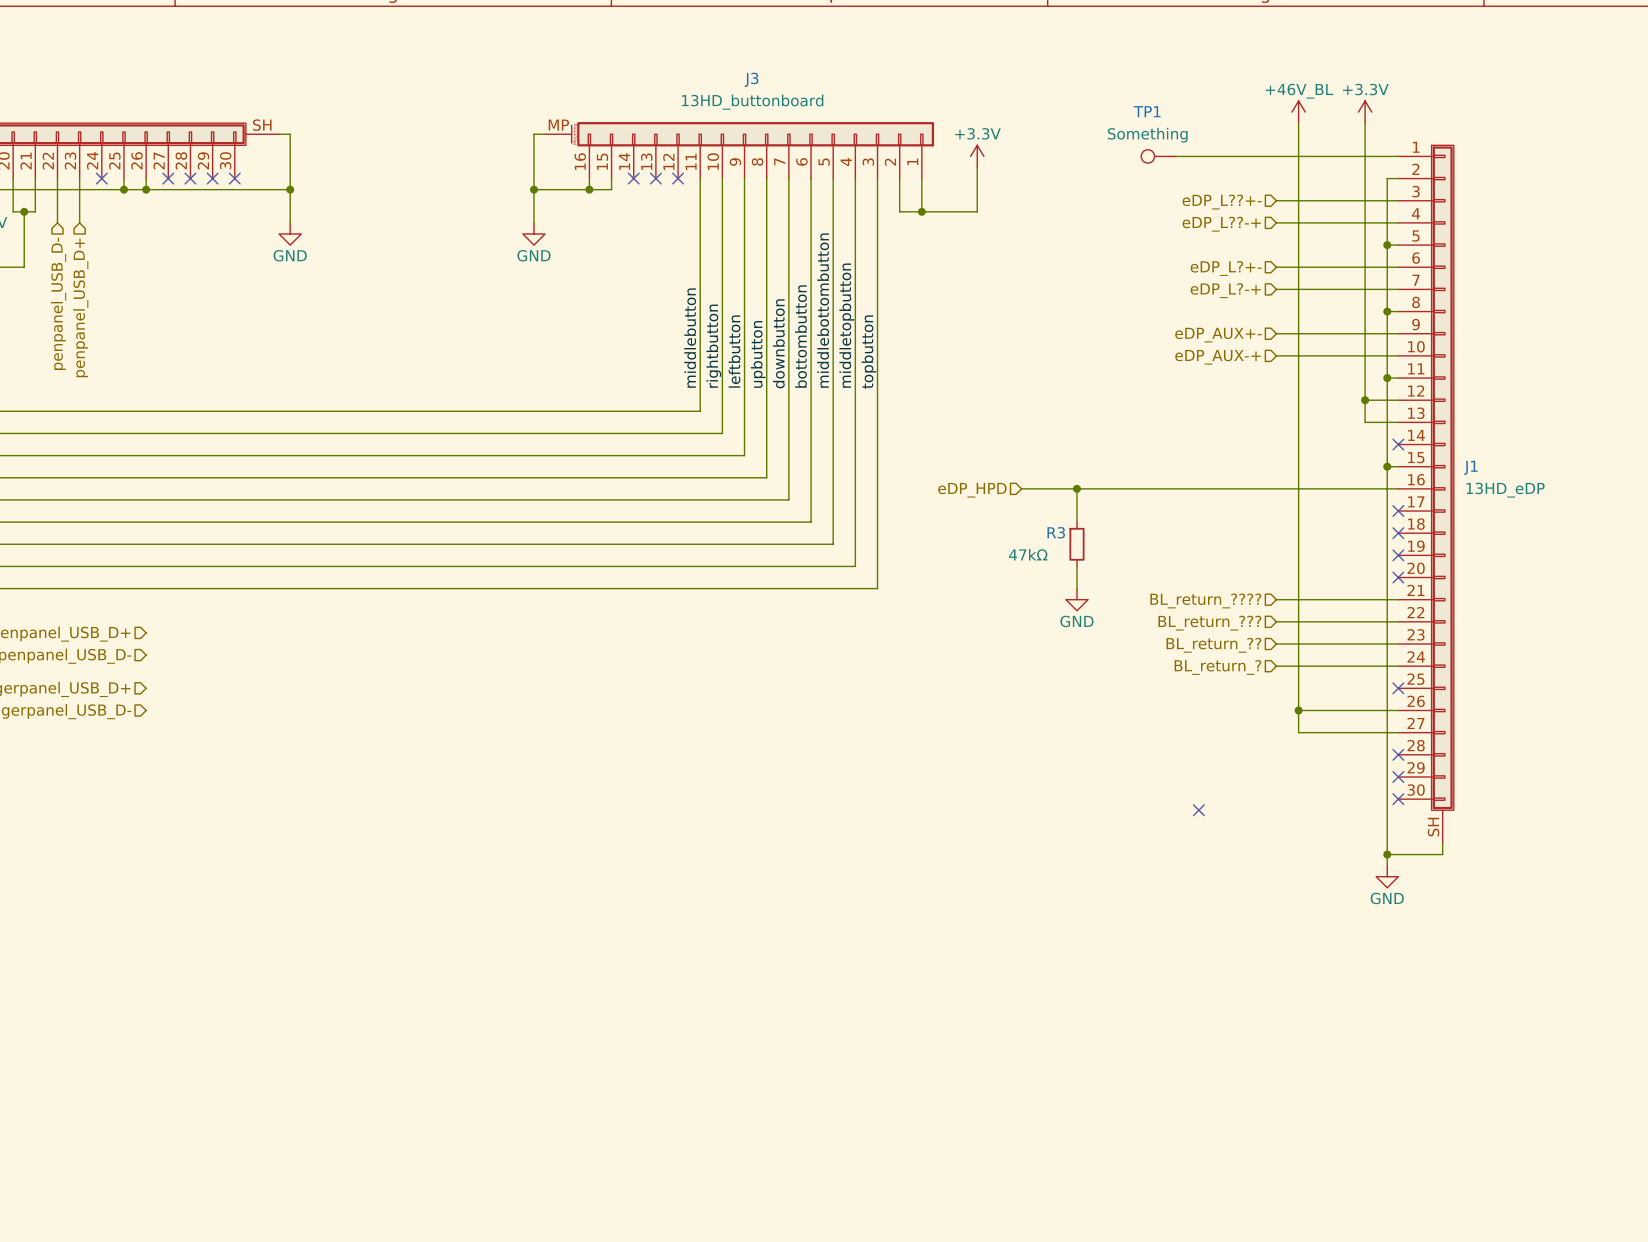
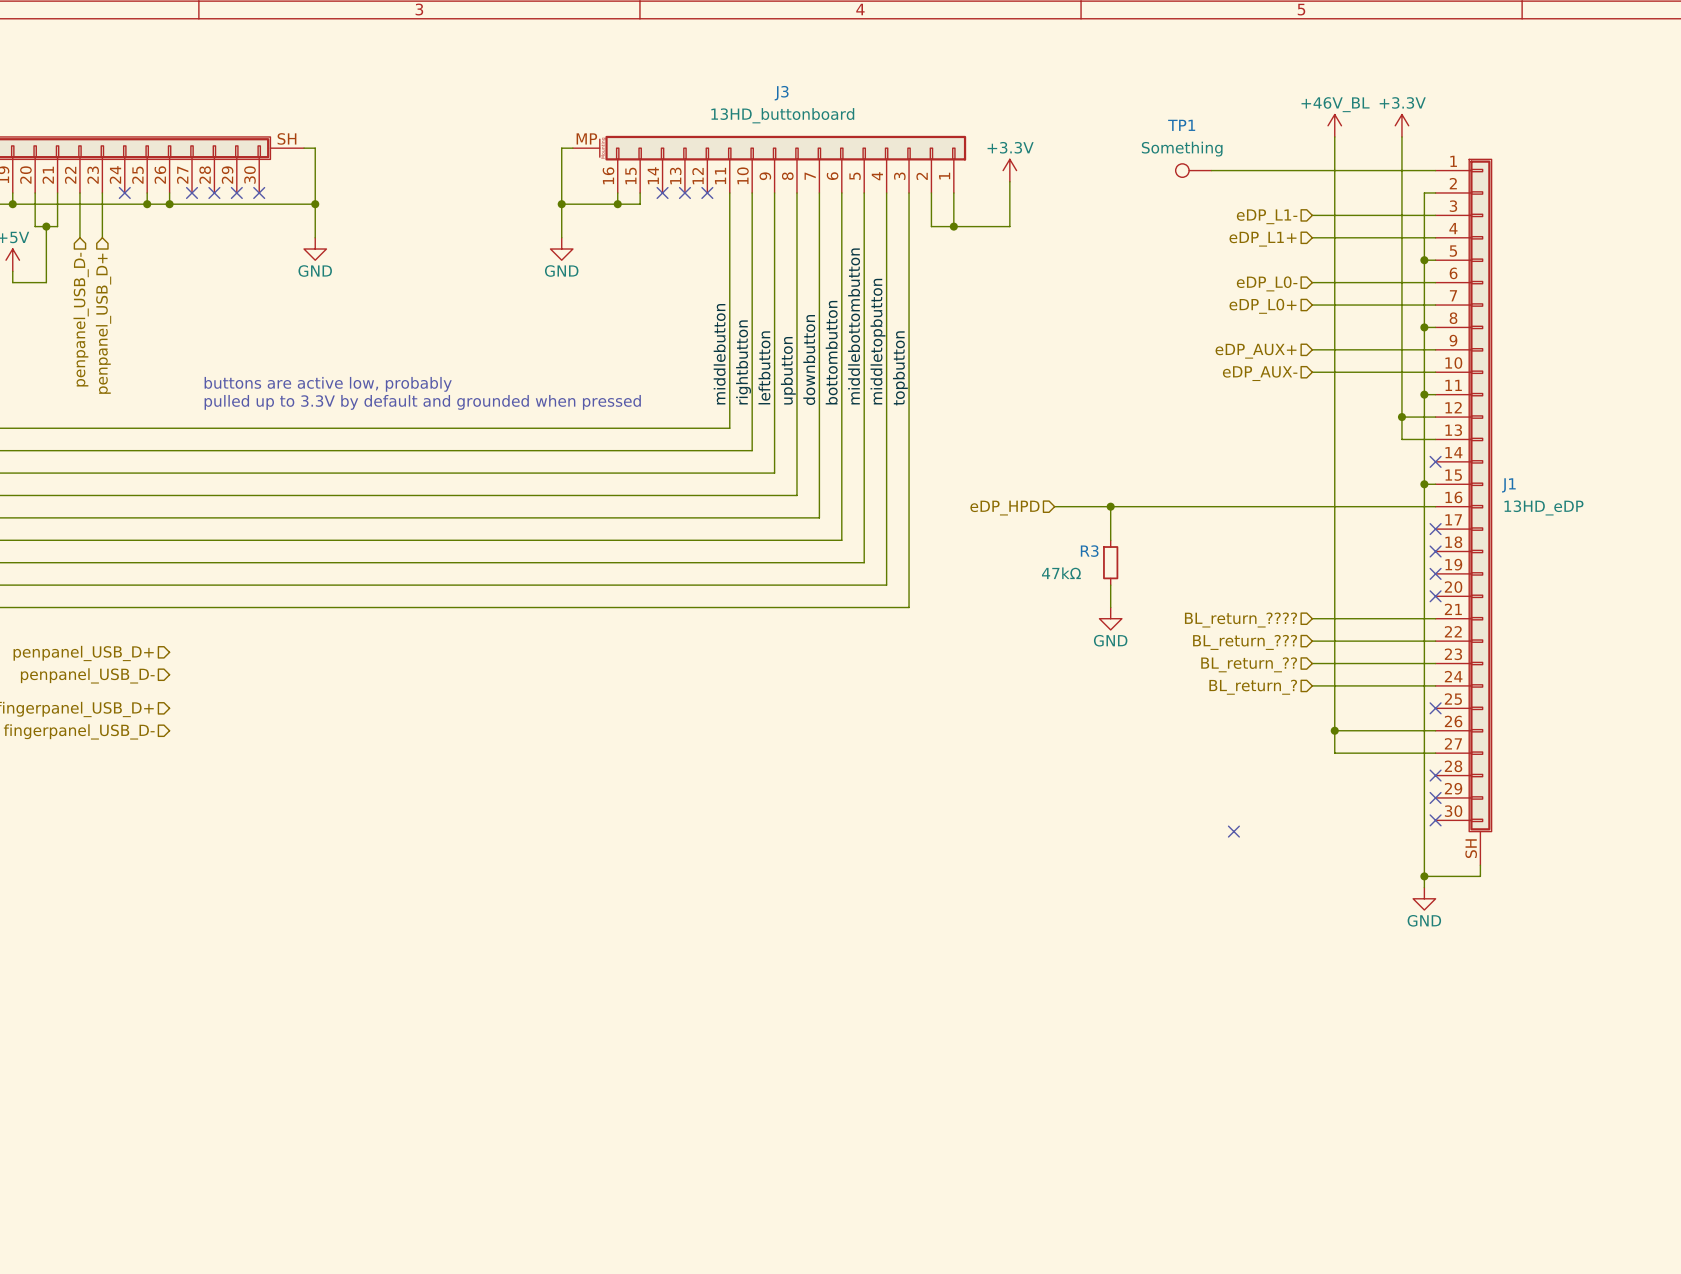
hierarchical label: eDP_L??+- (1222, 202) -> eDP_L1- (1267, 216)
hierarchical label: eDP_L??-+ (1221, 224) -> eDP_L1+ (1263, 239)
hierarchical label: eDP_L?+- (1226, 268) -> eDP_L0- (1267, 283)
hierarchical label: eDP_L?-+ (1225, 290) -> eDP_L0+ (1263, 306)
hierarchical label: eDP_AUX+- (1218, 335) -> eDP_AUX+ (1256, 351)
hierarchical label: eDP_AUX-+ (1218, 357) -> eDP_AUX- (1260, 373)
text: none -> buttons are active low, probably (328, 384)
text: none -> pulled up to 3.3V by default and grounded when pressed (422, 402)

